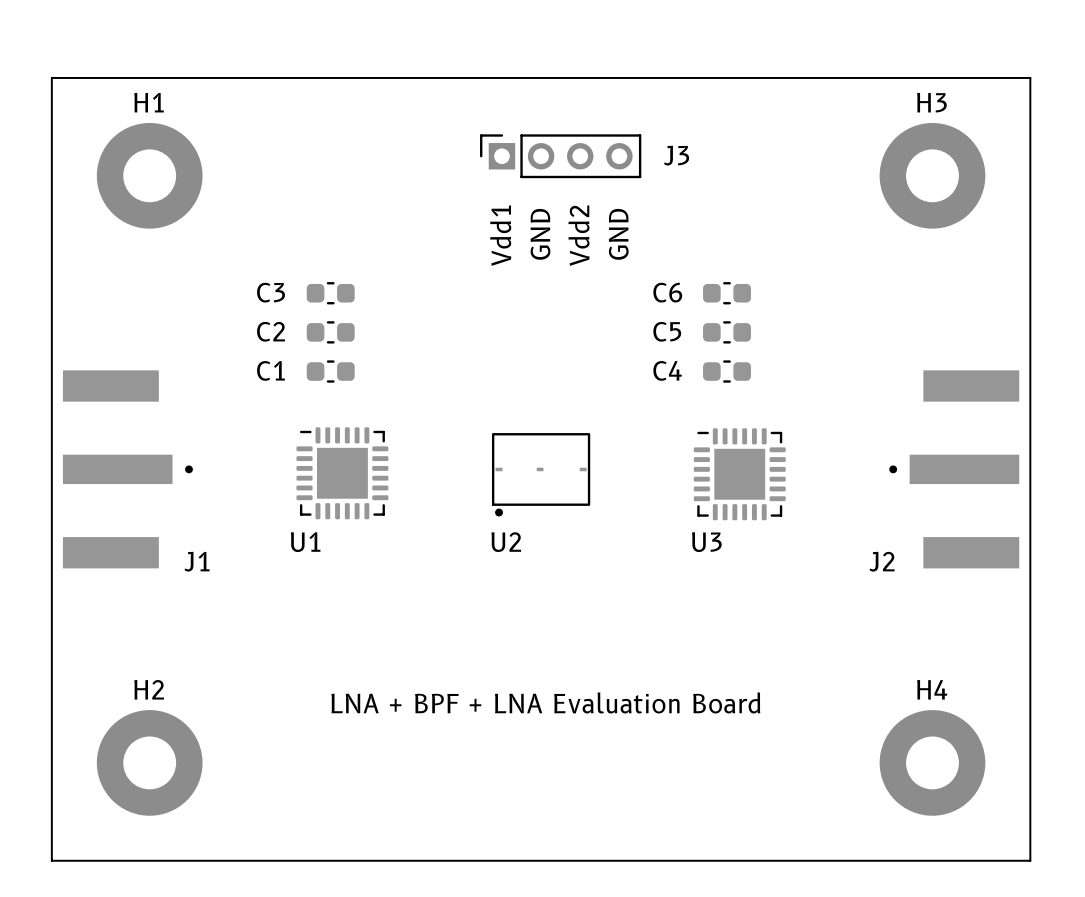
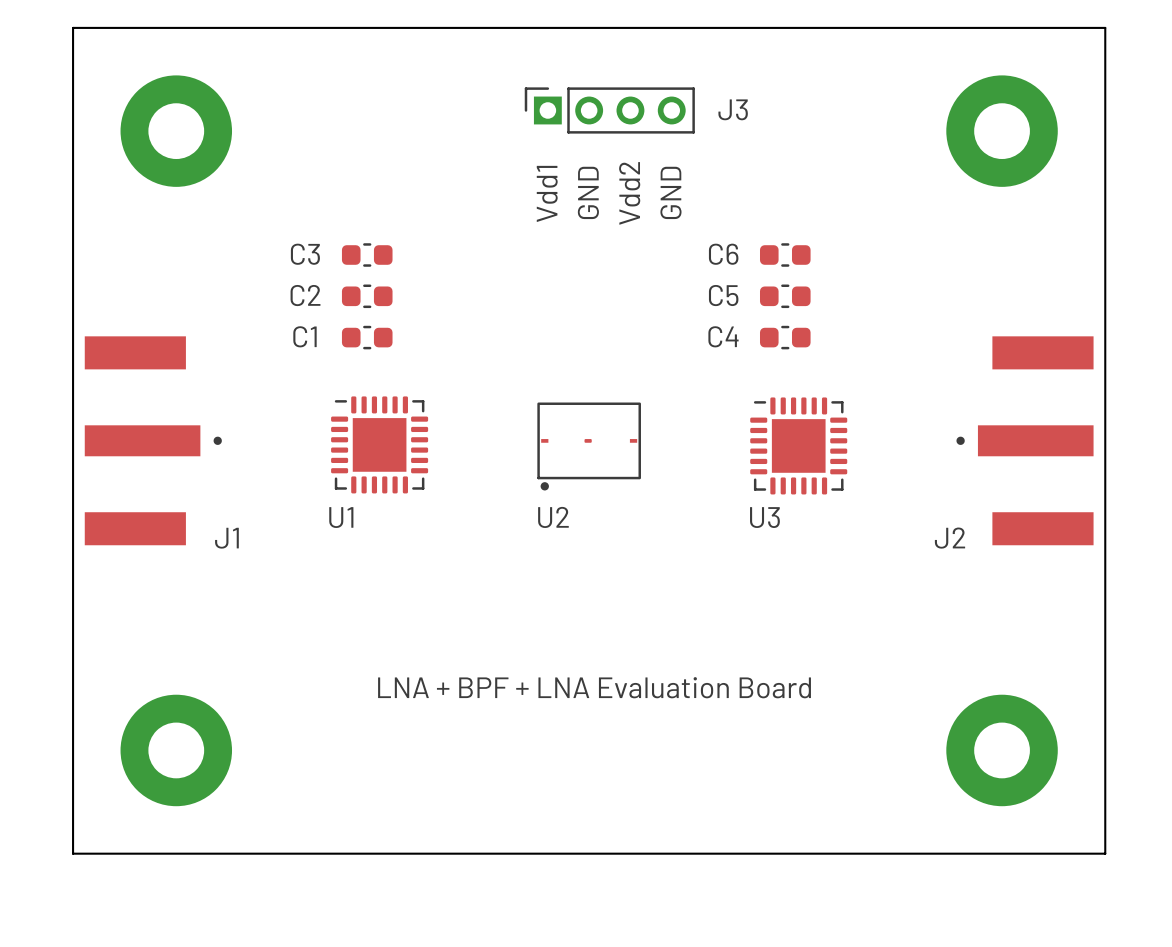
H1 name: H1 (149, 102) -> none
H3 name: H3 (931, 102) -> none
H2 name: H2 (149, 689) -> none
H4 name: H4 (932, 689) -> none

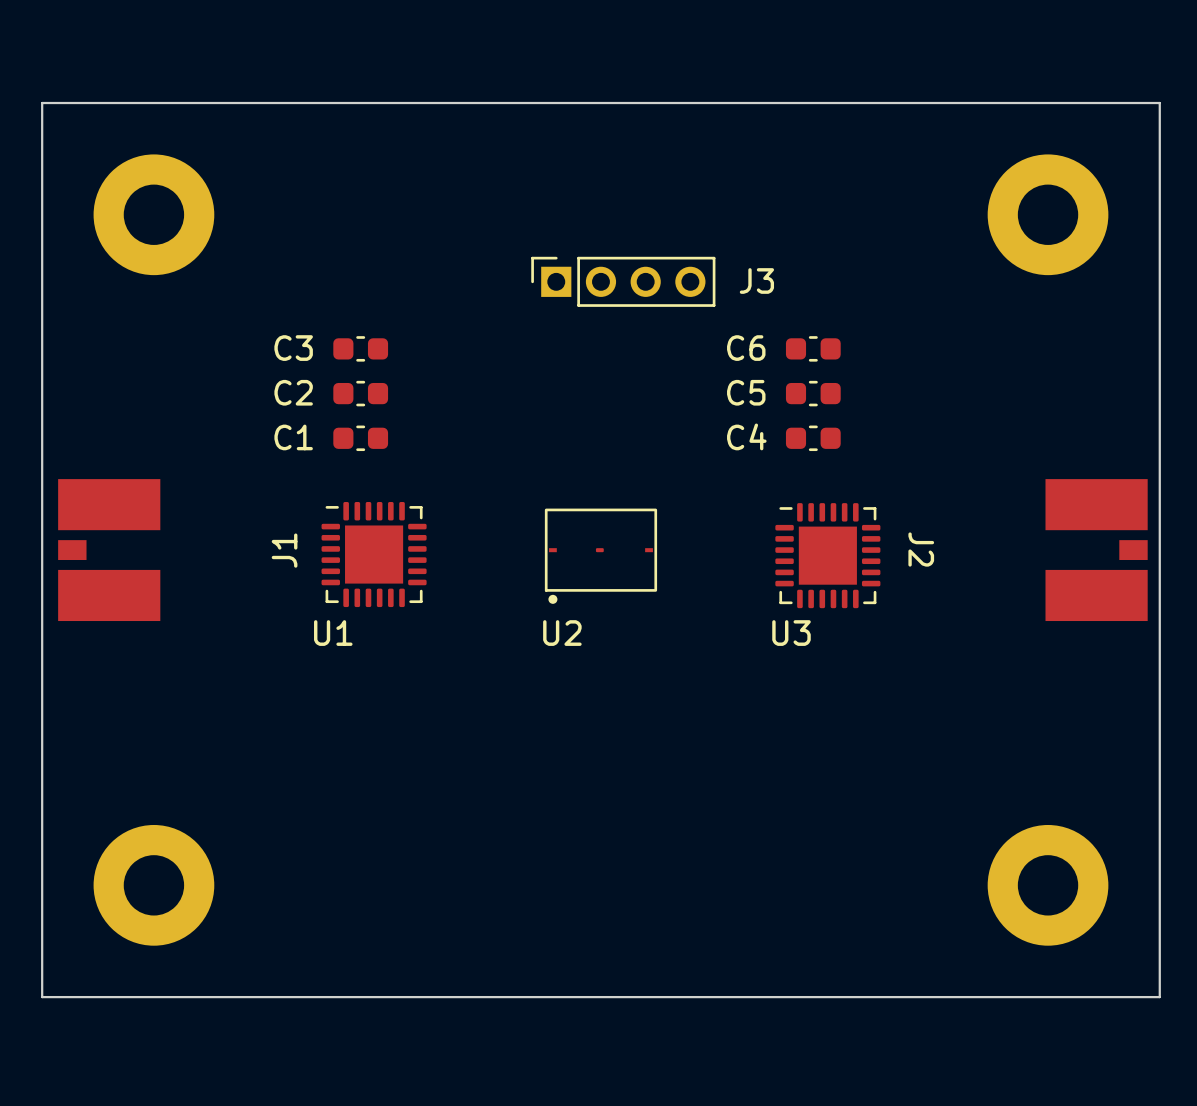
J3 position: (609, 110) -> (623, 281)
text: GND (588, 192) -> none
text: GND (670, 192) -> none
text: Vdd1 (547, 193) -> none
text: Vdd2 (629, 193) -> none
J1 footprint: [84, 336, 222, 546] -> [58, 479, 161, 622]
J2 footprint: [956, 336, 1094, 546] -> [1045, 479, 1148, 622]
J1 name position: J1 (226, 538) -> J1 (284, 550)
J2 name position: J2 (950, 538) -> J2 (921, 549)
text: LNA + BPF + LNA Evaluation Board (594, 687) -> none

